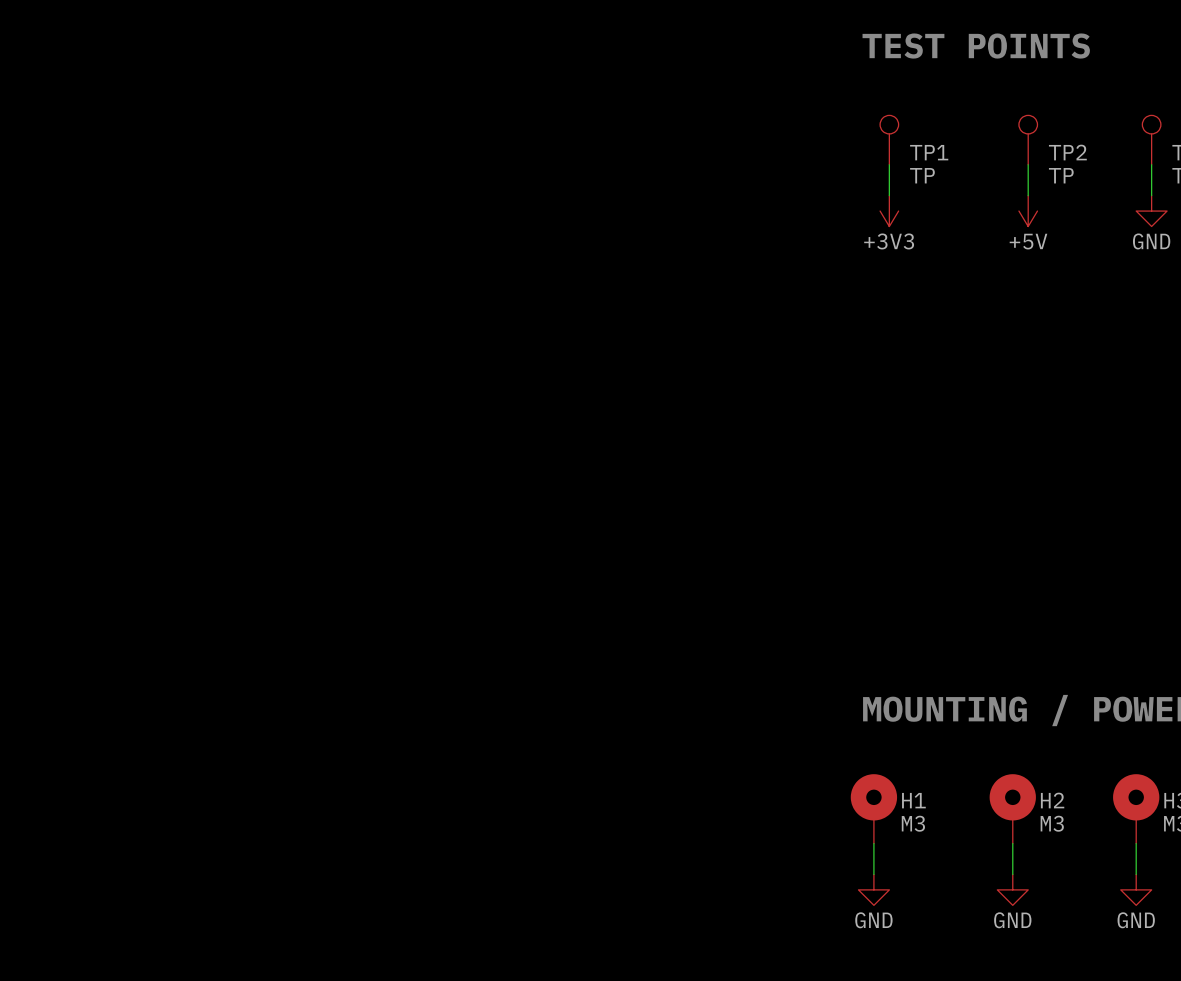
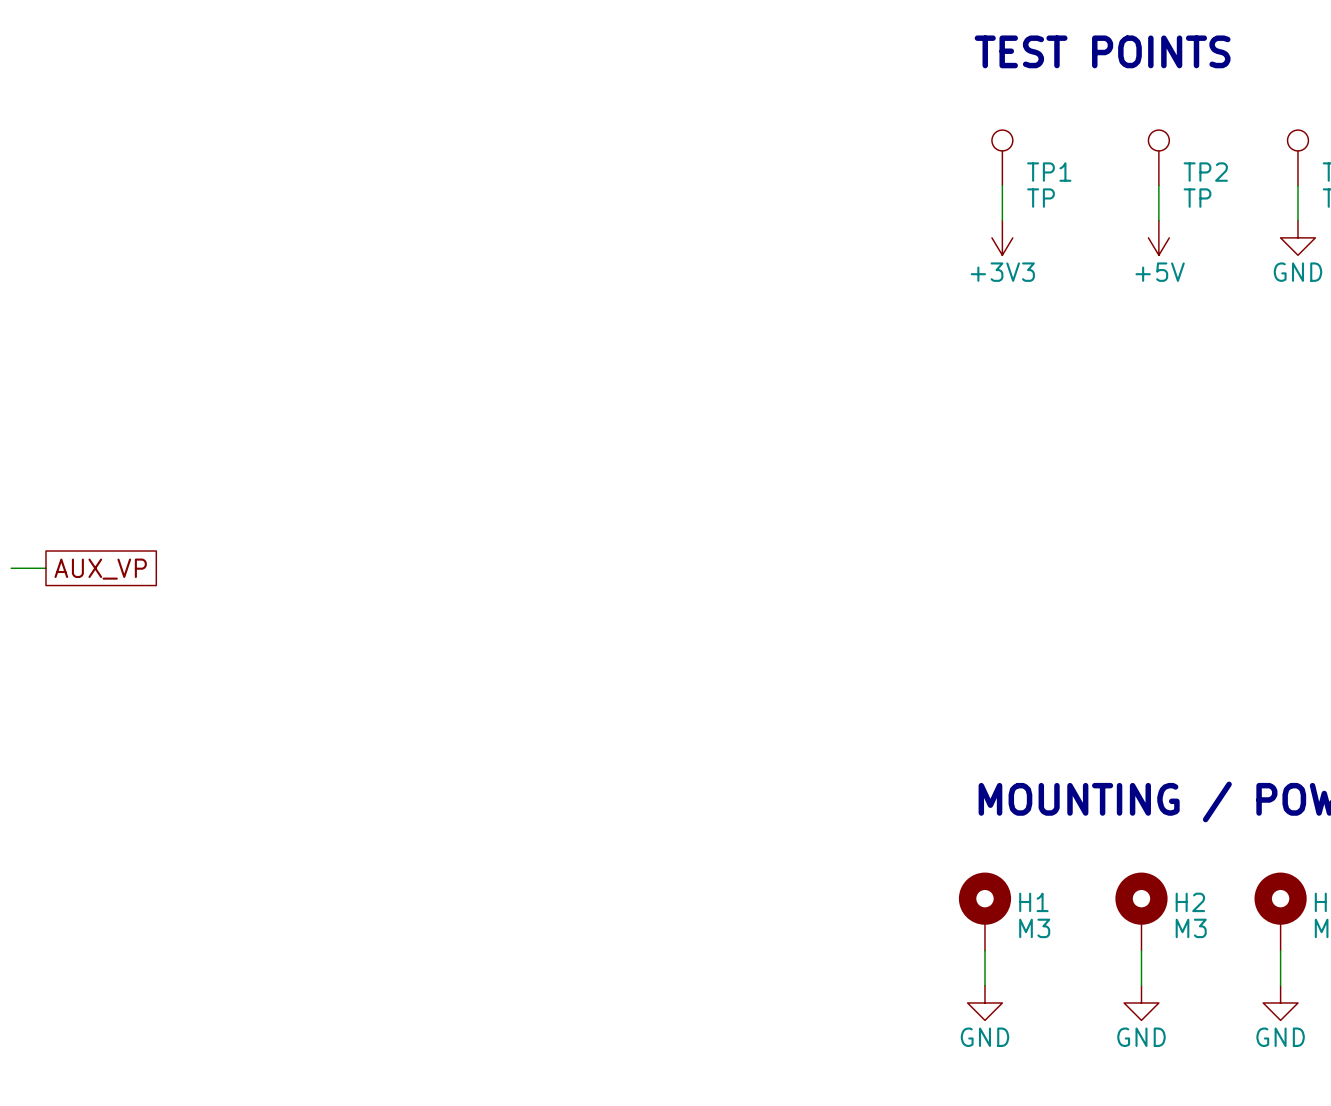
wire: none -> (11, 568) (45, 568)
global label: none -> AUX_VP (100, 569)

